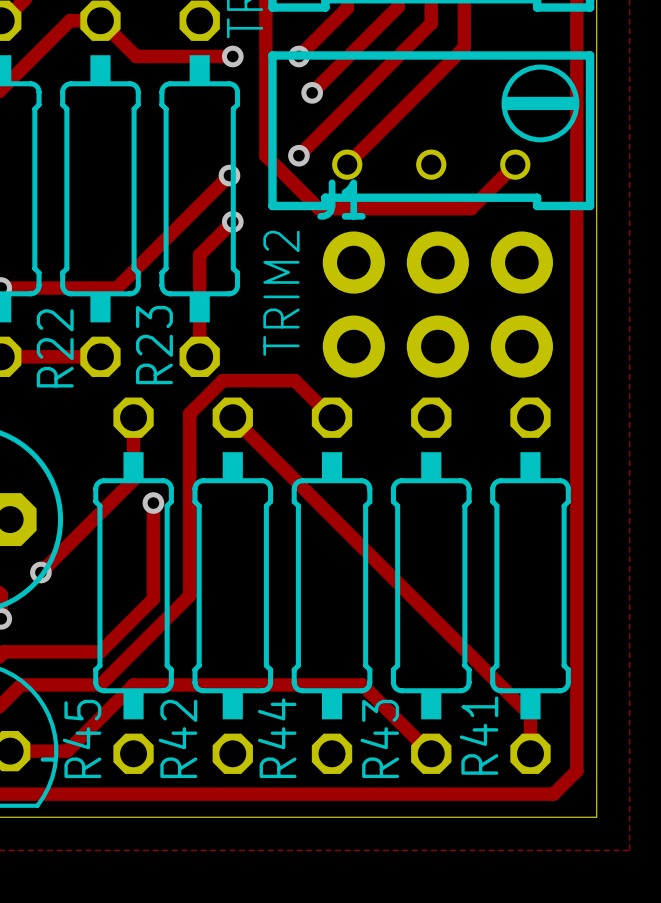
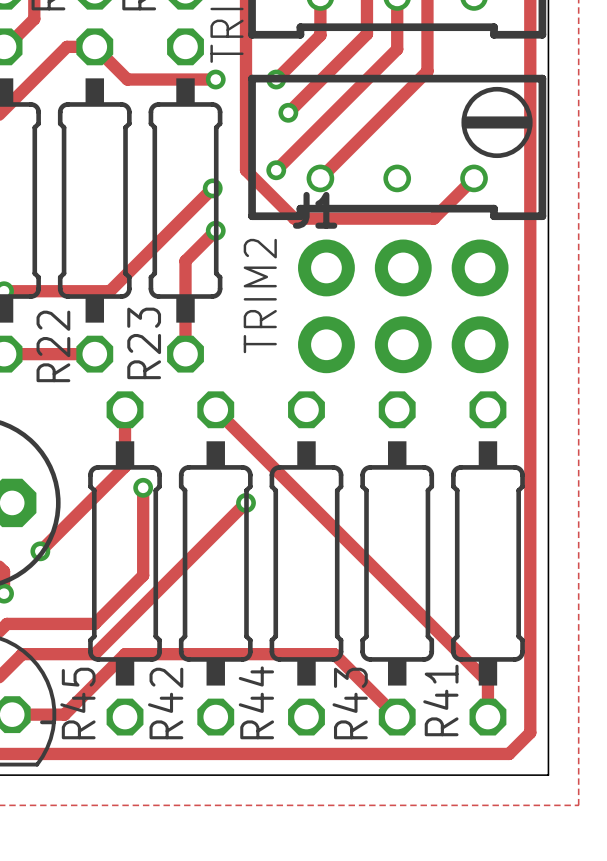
track: (332, 417) (294, 380) (222, 380) (189, 413) (189, 595) -> (246, 502) (176, 572)
via: none -> (246, 502)

